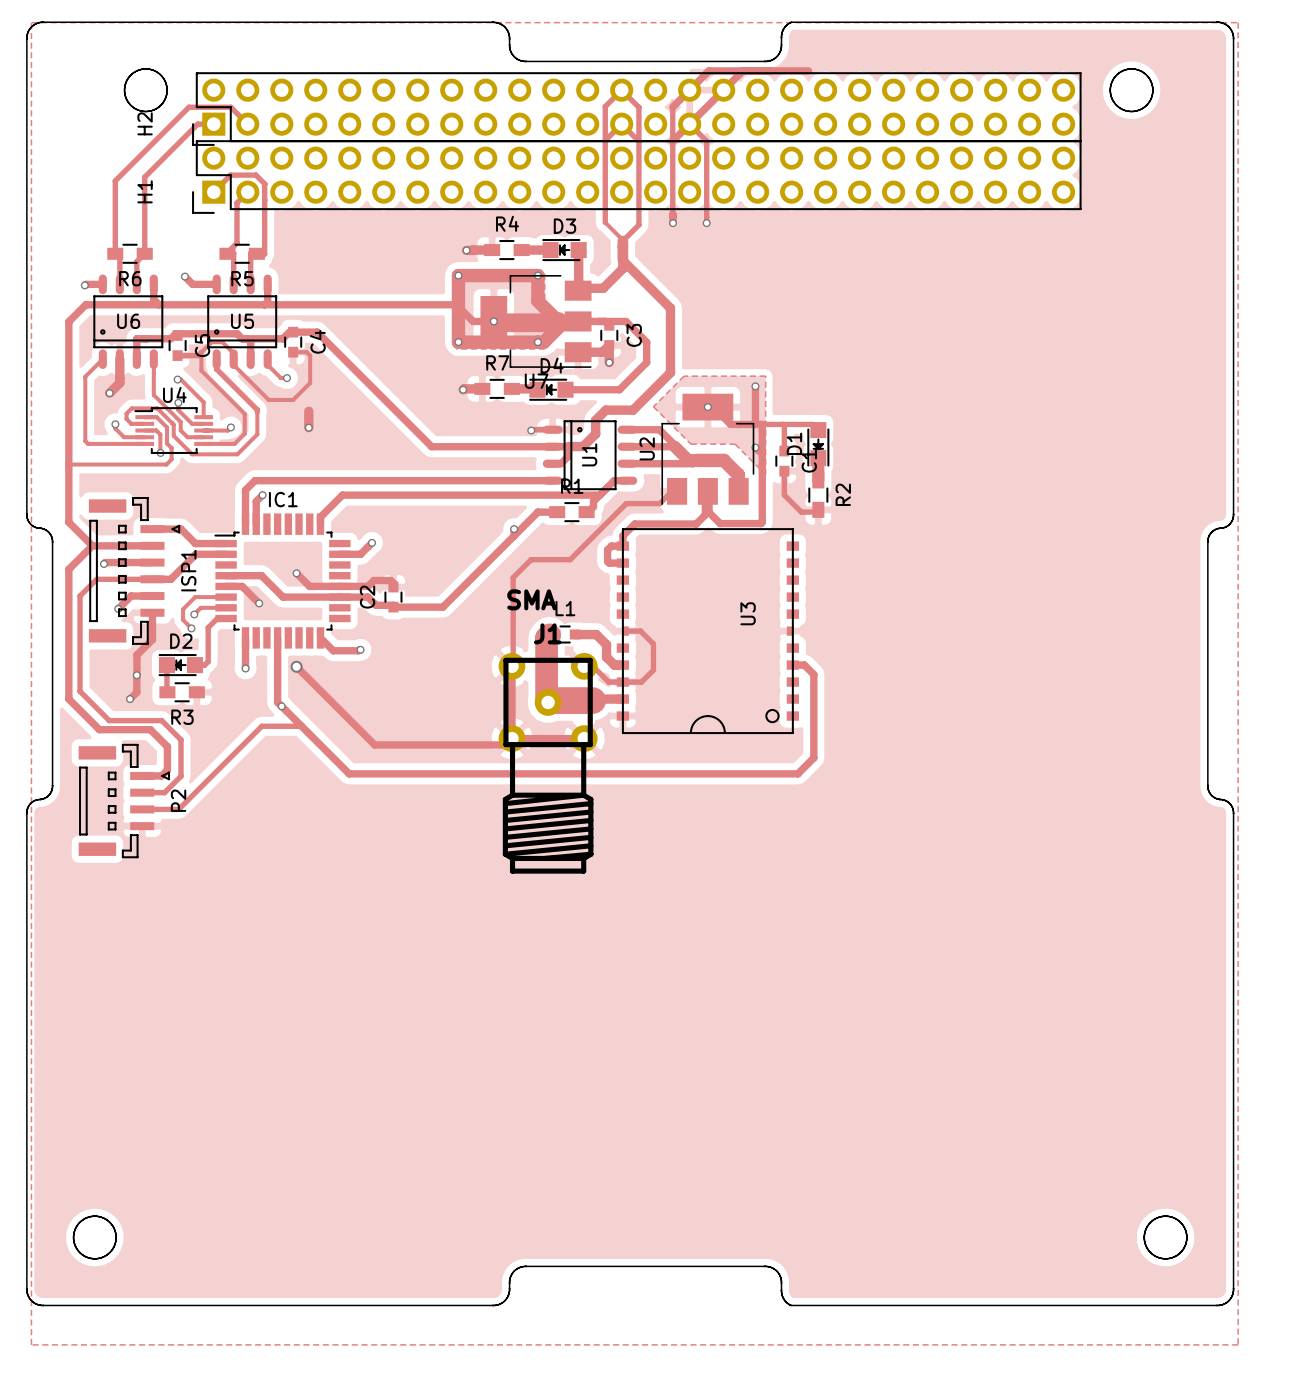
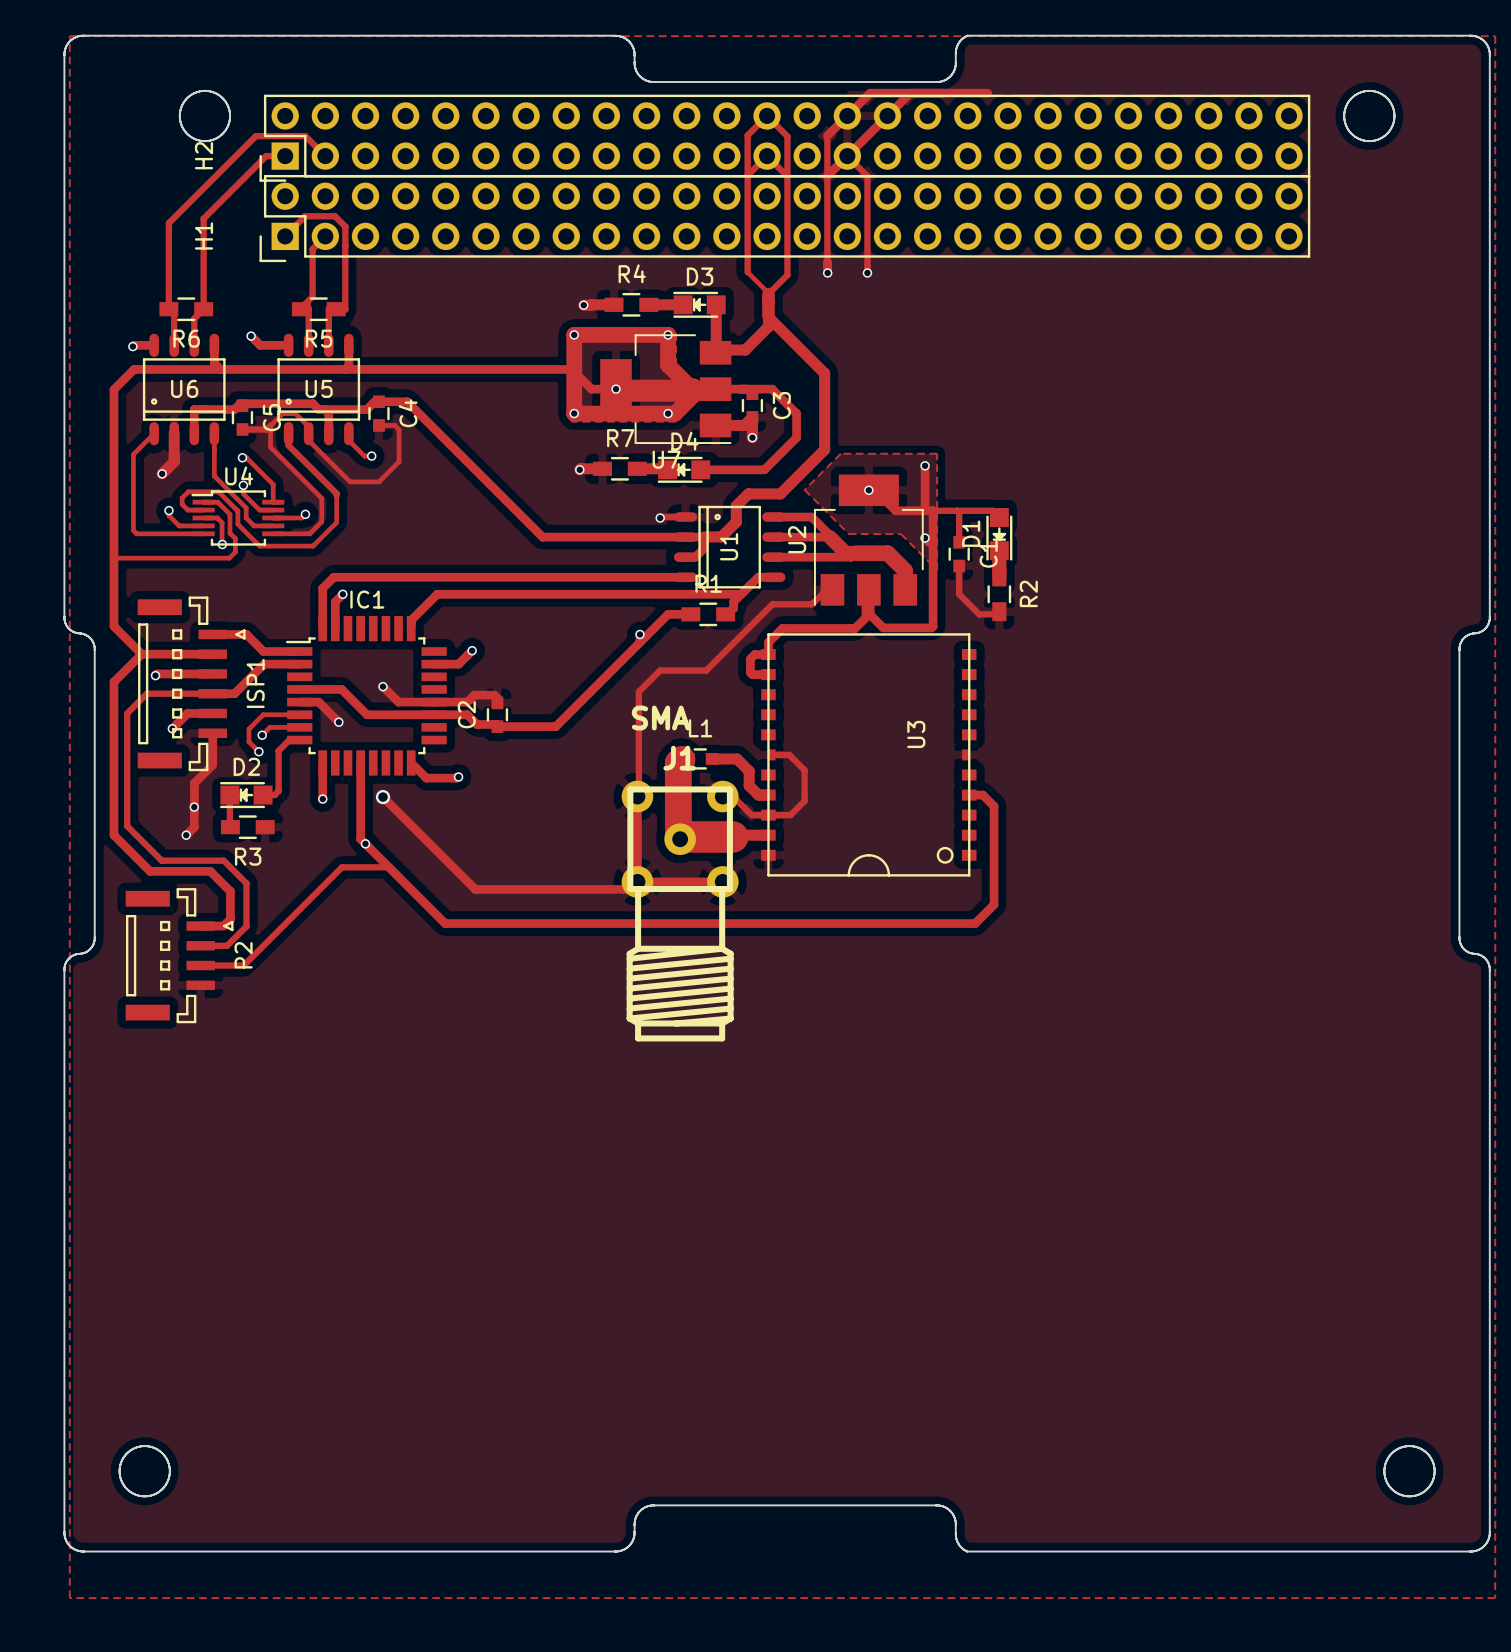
track: (308, 411) (308, 427) -> none
via: (308, 427) -> none

